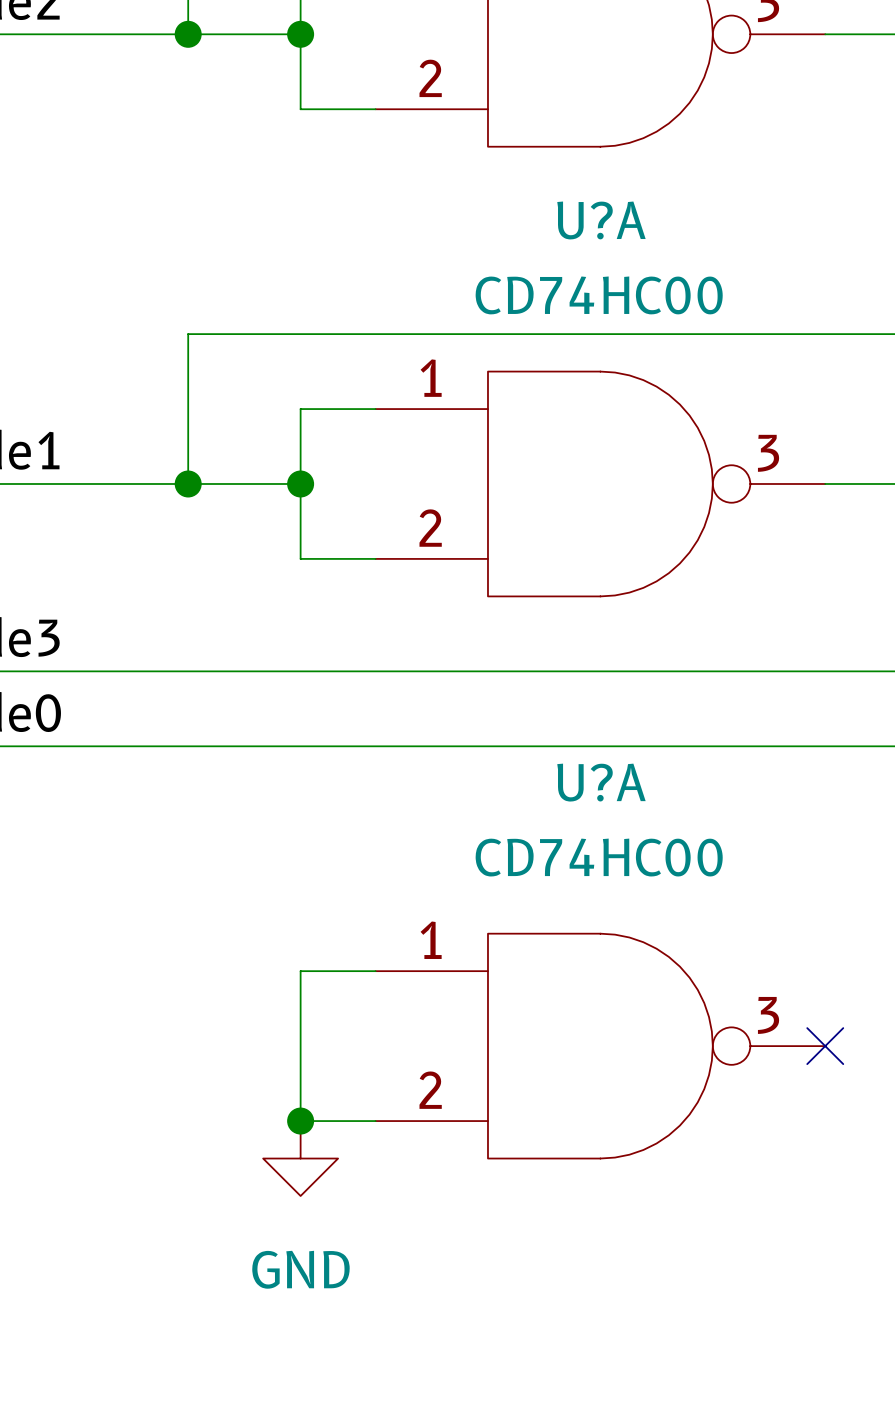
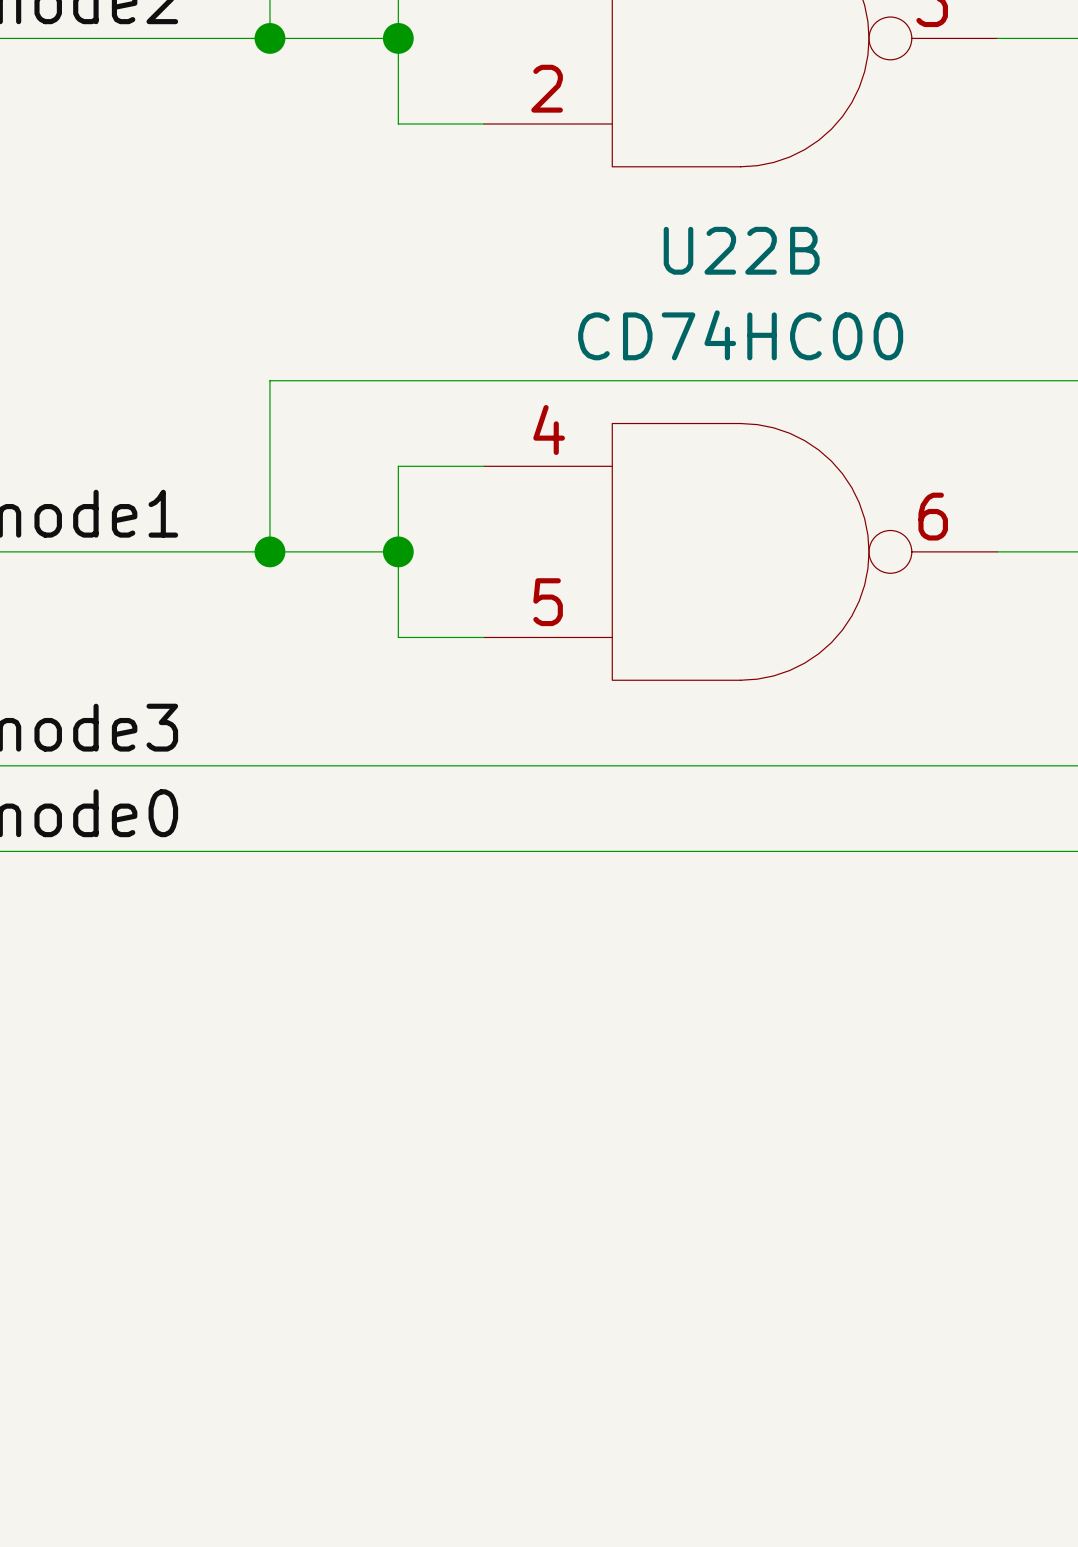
U?A name: U?A (601, 220) -> U22B (741, 250)
U?A pin number: 1 (431, 378) -> 4 (549, 429)
U?A pin number: 3 (768, 453) -> 6 (933, 516)
U?A pin number: 2 (430, 528) -> 5 (548, 602)
wire: (375, 971) (300, 971) (300, 1121) (375, 1121) -> none
U?A: CD74HC00 (600, 1046) -> none
no-connect mark: (825, 1046) -> none
junction: (300, 1121) -> none
power symbol: GND (300, 1158) -> none

